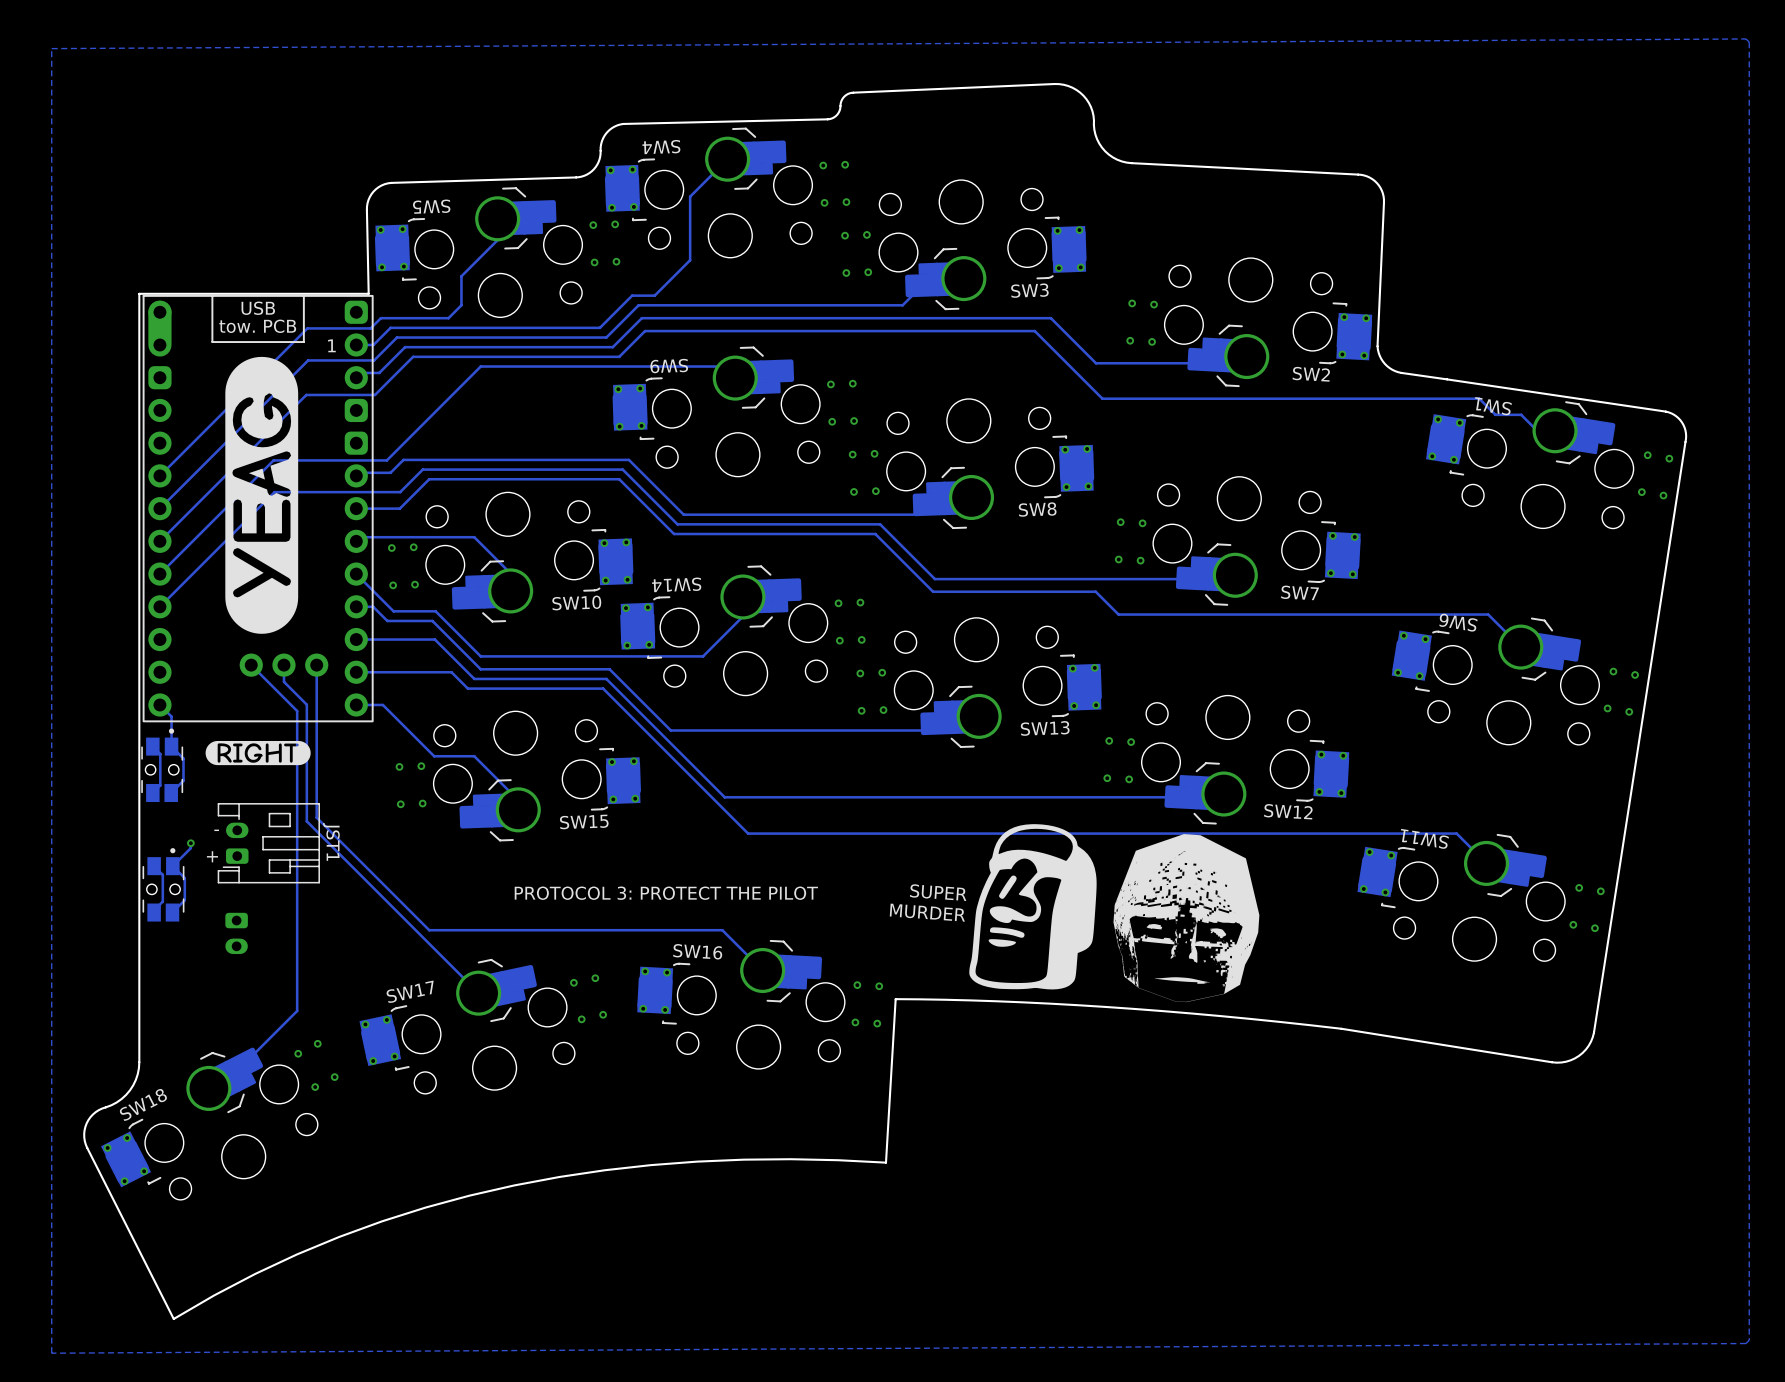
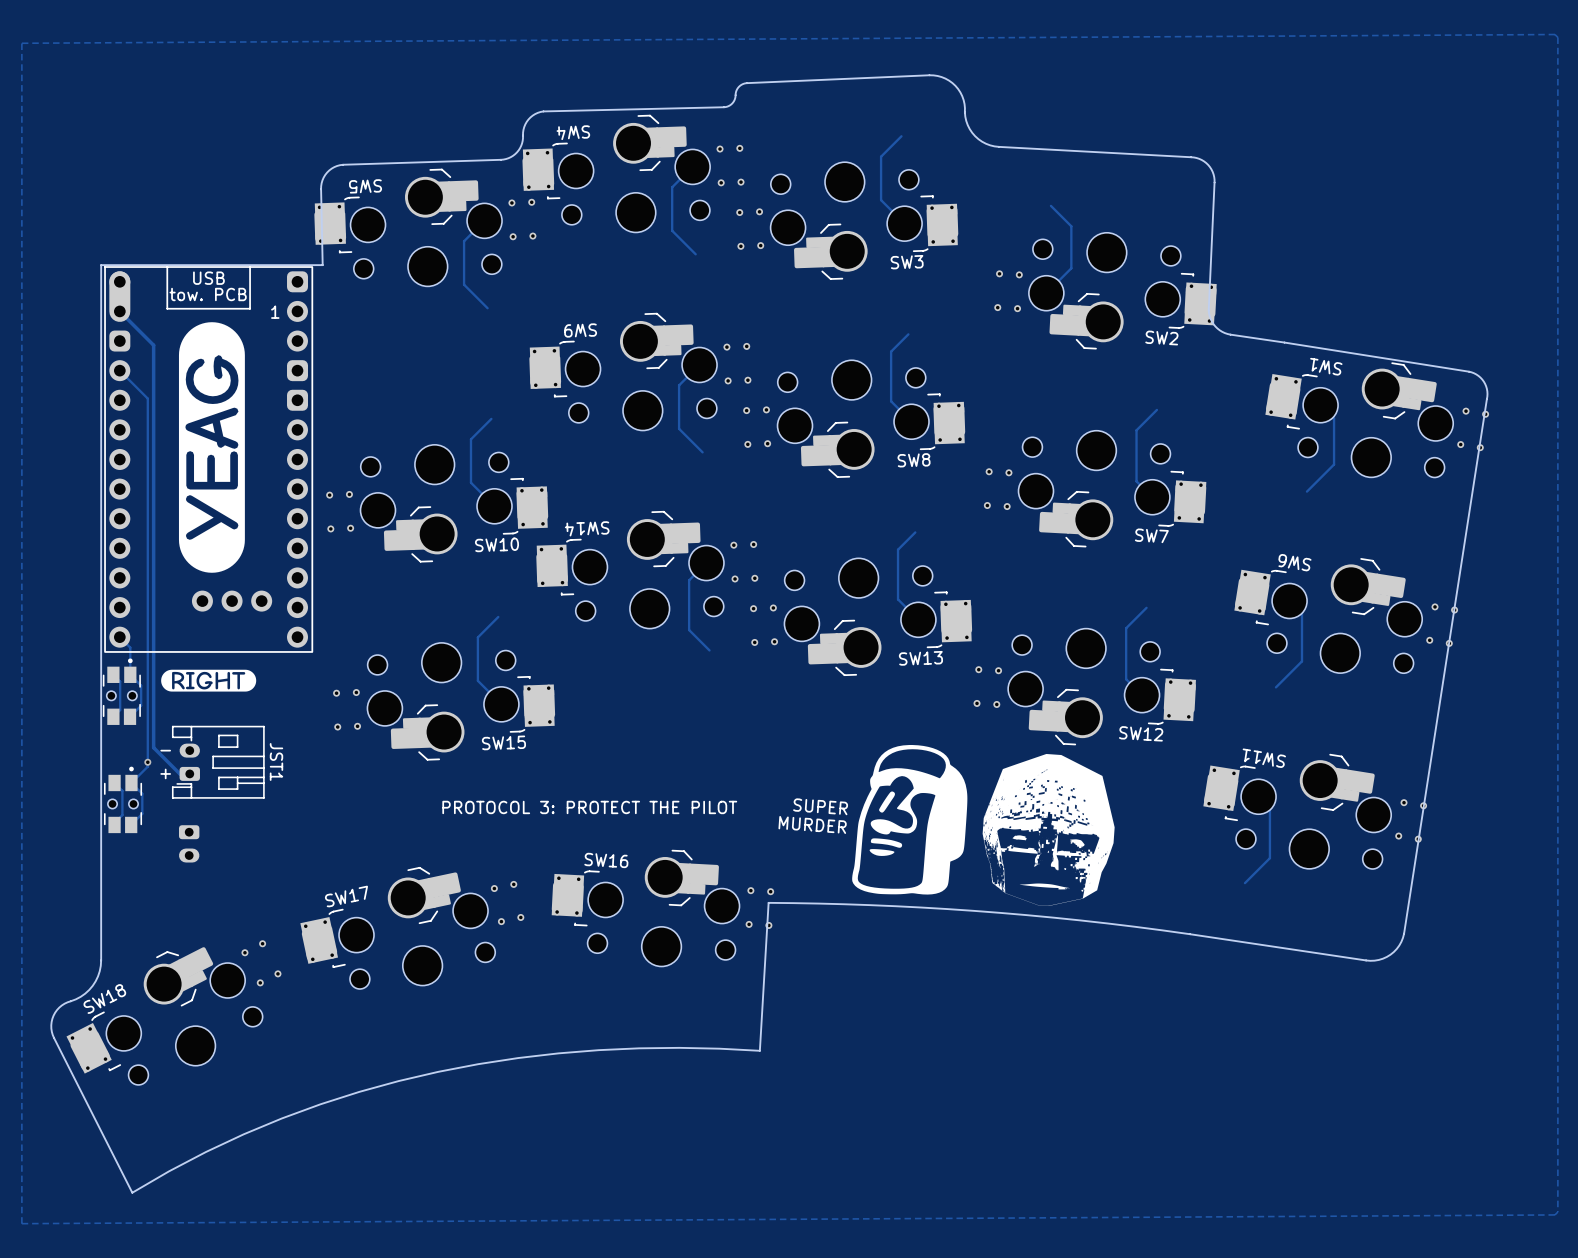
board edge: (827, 119) (623, 123) (614, 126) (606, 132) (601, 141) (597, 164) (589, 172) (581, 176) (384, 184) (373, 191) (367, 206) (368, 293) -> (723, 107) (543, 111) (535, 114) (528, 119) (524, 127) (520, 148) (515, 154) (506, 159) (337, 165) (327, 172) (321, 186) (322, 265) (308, 265)
track: none -> (901, 136) (881, 156) (881, 200) (904, 223)
track: (727, 159) (690, 196) (690, 260) (654, 295) (632, 295) (599, 327) (390, 327) (373, 344) (356, 344) -> none
board edge: (1131, 163) (1358, 174) (1369, 177) (1380, 187) (1383, 199) (1377, 346) (1379, 355) (1387, 366) (1401, 372) (1665, 411) (1676, 416) (1683, 425) (1685, 439) (1593, 1032) (1585, 1049) (1570, 1060) (1556, 1062) (1341, 1028) (1250, 1018) (1077, 1005) (895, 999) (885, 1162) (790, 1159) (697, 1161) (604, 1170) (514, 1185) (425, 1207) (339, 1236) (255, 1273) (173, 1318) -> (998, 146) (1191, 157) (1201, 159) (1209, 167) (1214, 179) (1208, 310) (1210, 319) (1217, 328) (1230, 334) (1469, 371) (1478, 375) (1485, 383) (1487, 396) (1404, 933) (1396, 948) (1386, 956) (1370, 960) (1162, 930) (1053, 917) (921, 907) (768, 902) (759, 1050) (679, 1047) (598, 1050) (518, 1058) (438, 1071) (359, 1091) (281, 1118) (206, 1151) (132, 1192)
track: none -> (692, 166) (672, 187) (672, 230) (695, 254)
track: (497, 218) (497, 240) (461, 276) (461, 305) (448, 318) (380, 318) (370, 328) (307, 328) (159, 475) -> none
track: none -> (1050, 205) (1071, 226) (1071, 268) (1046, 293)
track: none -> (484, 220) (464, 241) (464, 284) (487, 308)
track: (922, 285) (902, 305) (638, 305) (606, 337) (397, 337) (374, 360) (308, 360) (159, 508) -> none
track: none -> (119, 311) (153, 345) (153, 747) (179, 773) (189, 773)
track: (1204, 359) (1201, 363) (1096, 363) (1050, 318) (641, 318) (612, 347) (405, 347) (379, 372) (361, 372) (356, 377) -> none
track: none -> (908, 334) (891, 351) (891, 401) (911, 421)
track: (735, 378) (723, 366) (480, 366) (386, 460) (273, 460) (159, 574) -> none
track: none -> (699, 364) (679, 385) (679, 428) (702, 452)
track: none -> (119, 370) (147, 398) (147, 762)
track: (1555, 430) (1537, 430) (1521, 414) (1495, 414) (1479, 398) (1102, 398) (1034, 331) (645, 331) (619, 356) (413, 356) (374, 394) (306, 394) (159, 541) -> none
track: none -> (1320, 405) (1334, 418) (1334, 464) (1306, 491)
track: none -> (1156, 409) (1136, 430) (1136, 481) (1152, 497)
track: none -> (491, 418) (470, 439) (470, 482) (494, 506)
track: (356, 475) (359, 472) (390, 472) (403, 459) (628, 459) (683, 514) (919, 514) (930, 504) -> none
track: (356, 508) (399, 508) (429, 479) (619, 479) (674, 534) (875, 534) (933, 591) (1095, 591) (1118, 614) (1488, 614) (1520, 647) -> none
track: (356, 541) (360, 537) (474, 537) (510, 573) (510, 590) -> none
track: (356, 574) (393, 611) (435, 611) (480, 656) (703, 656) (742, 616) (742, 597) -> none
track: (1193, 578) (934, 579) (880, 524) (677, 524) (622, 469) (422, 469) (400, 492) (274, 492) (159, 606) -> none
track: none -> (915, 532) (898, 549) (898, 599) (918, 619)
track: (356, 606) (373, 606) (387, 620) (432, 620) (480, 669) (609, 669) (670, 730) (930, 730) (937, 723) -> none
track: none -> (706, 563) (689, 580) (689, 630) (709, 650)
track: (356, 639) (434, 639) (474, 678) (606, 678) (724, 797) (1181, 797) -> none
track: (251, 665) (297, 711) (297, 1010) (243, 1064) -> none
track: (283, 665) (283, 681) (306, 704) (306, 821) (478, 993) -> none
track: (316, 665) (316, 817) (429, 930) (722, 930) (762, 970) -> none
track: none -> (1289, 601) (1301, 613) (1301, 661) (1275, 687)
track: (356, 672) (451, 672) (467, 688) (603, 688) (748, 833) (1456, 833) (1486, 863) -> none
track: none -> (1146, 607) (1126, 628) (1126, 679) (1142, 695)
track: none -> (498, 616) (477, 637) (477, 680) (501, 704)
track: (356, 704) (382, 704) (434, 756) (474, 756) (518, 800) (518, 809) -> none
track: none -> (1258, 796) (1269, 808) (1269, 858) (1244, 883)

